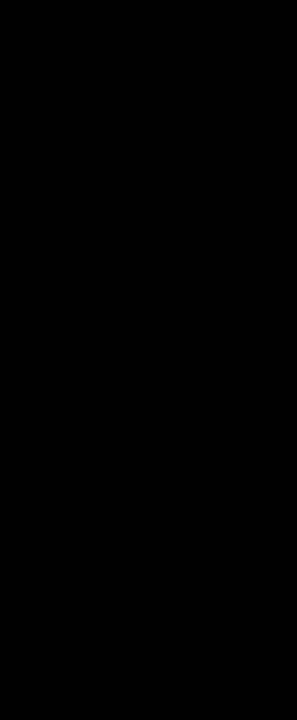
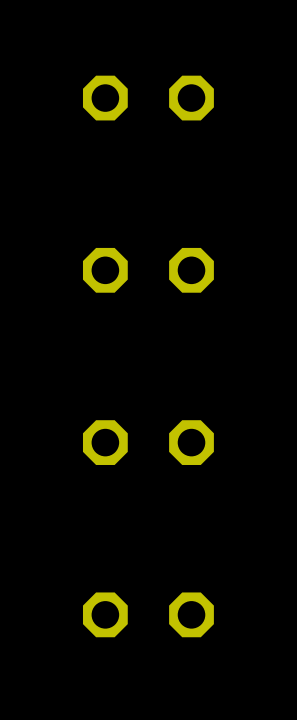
part: none -> (148, 98)
part: none -> (148, 270)
part: none -> (148, 442)
part: none -> (148, 614)

